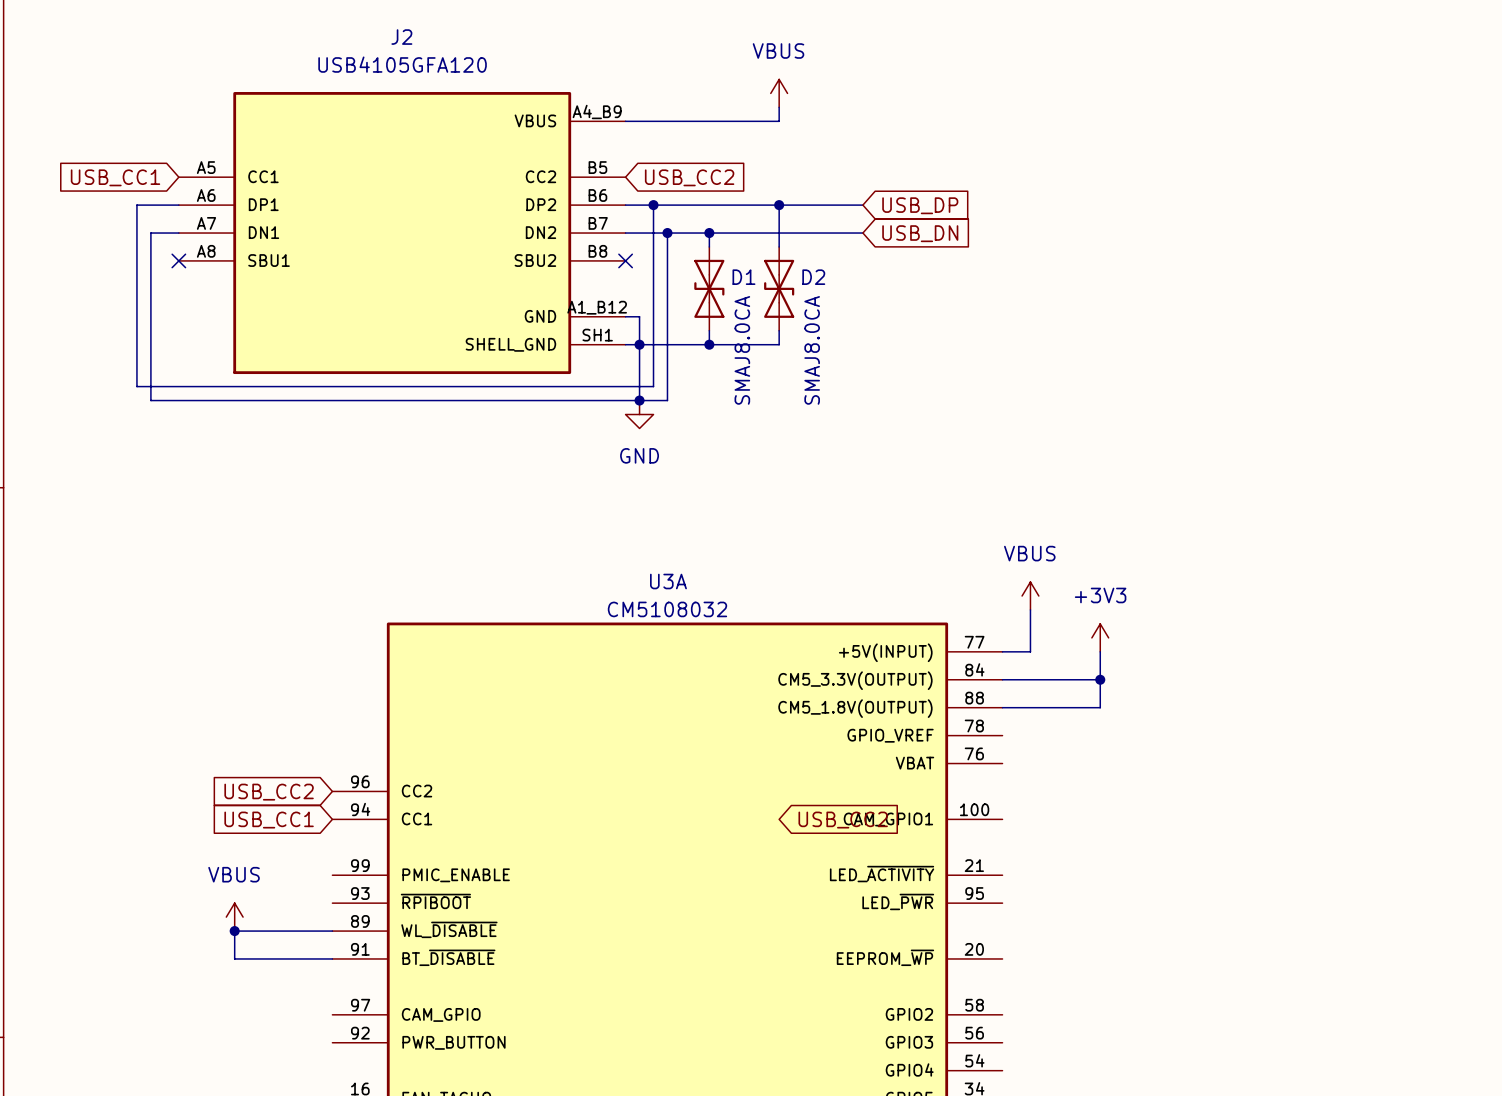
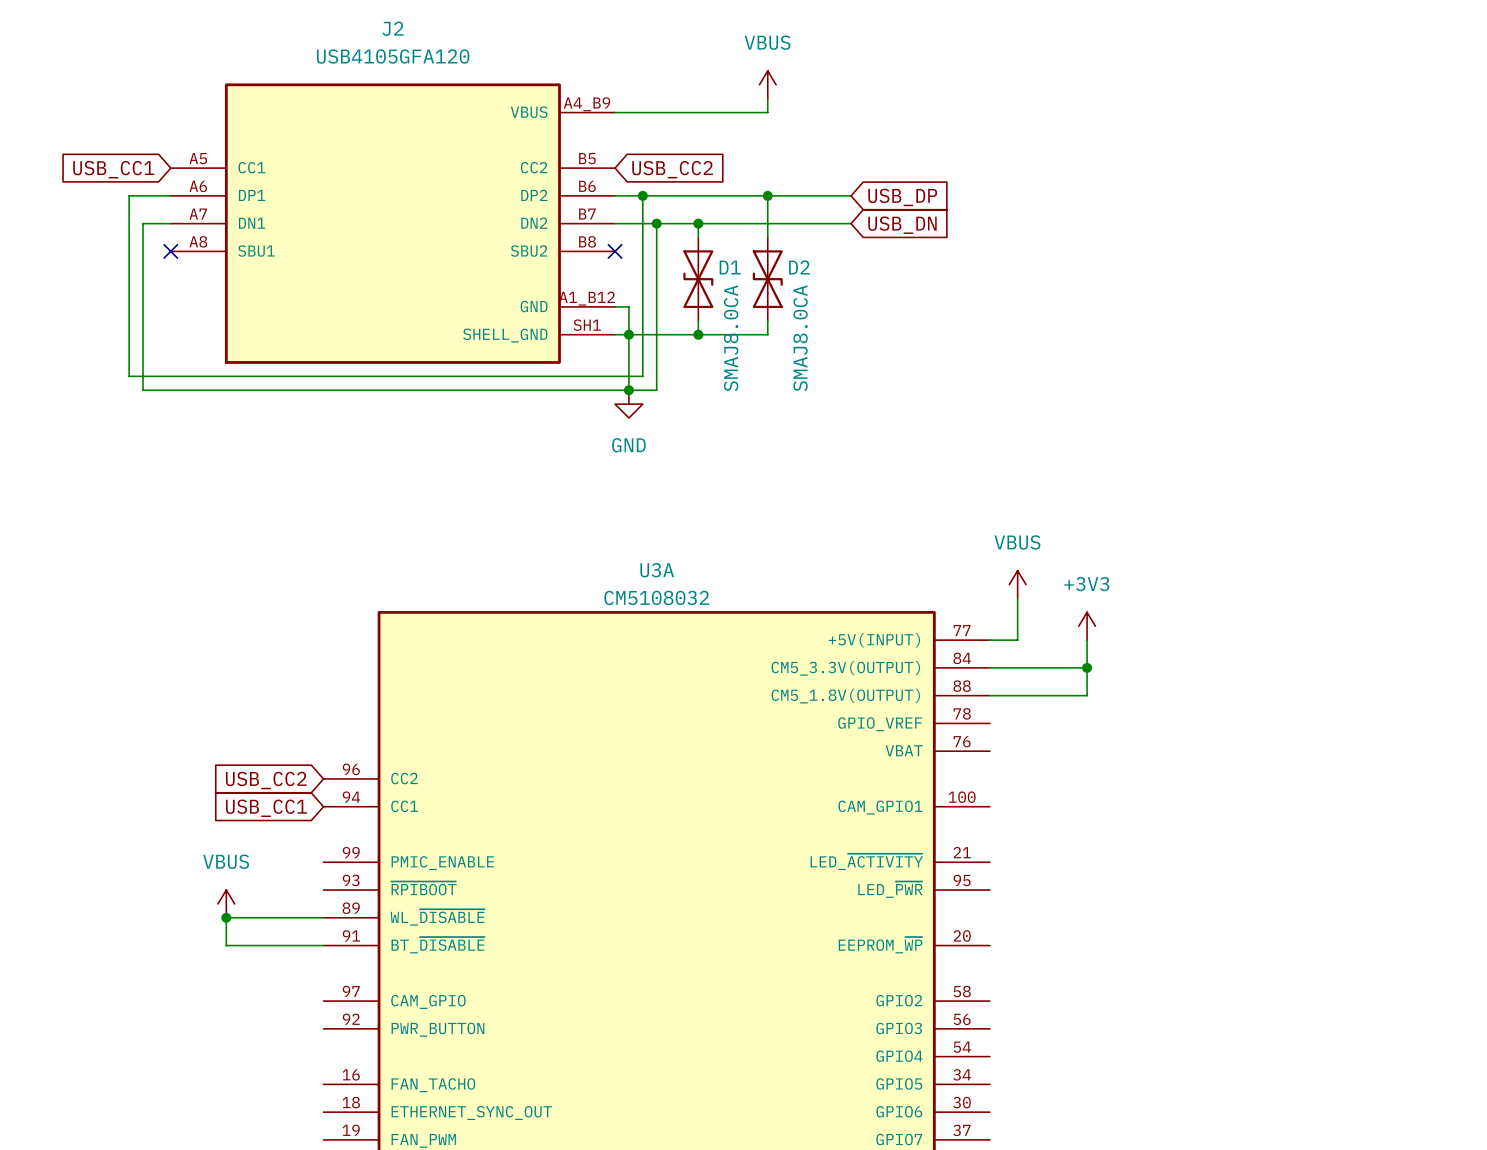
global label: USB_CC2 (843, 820) -> none

